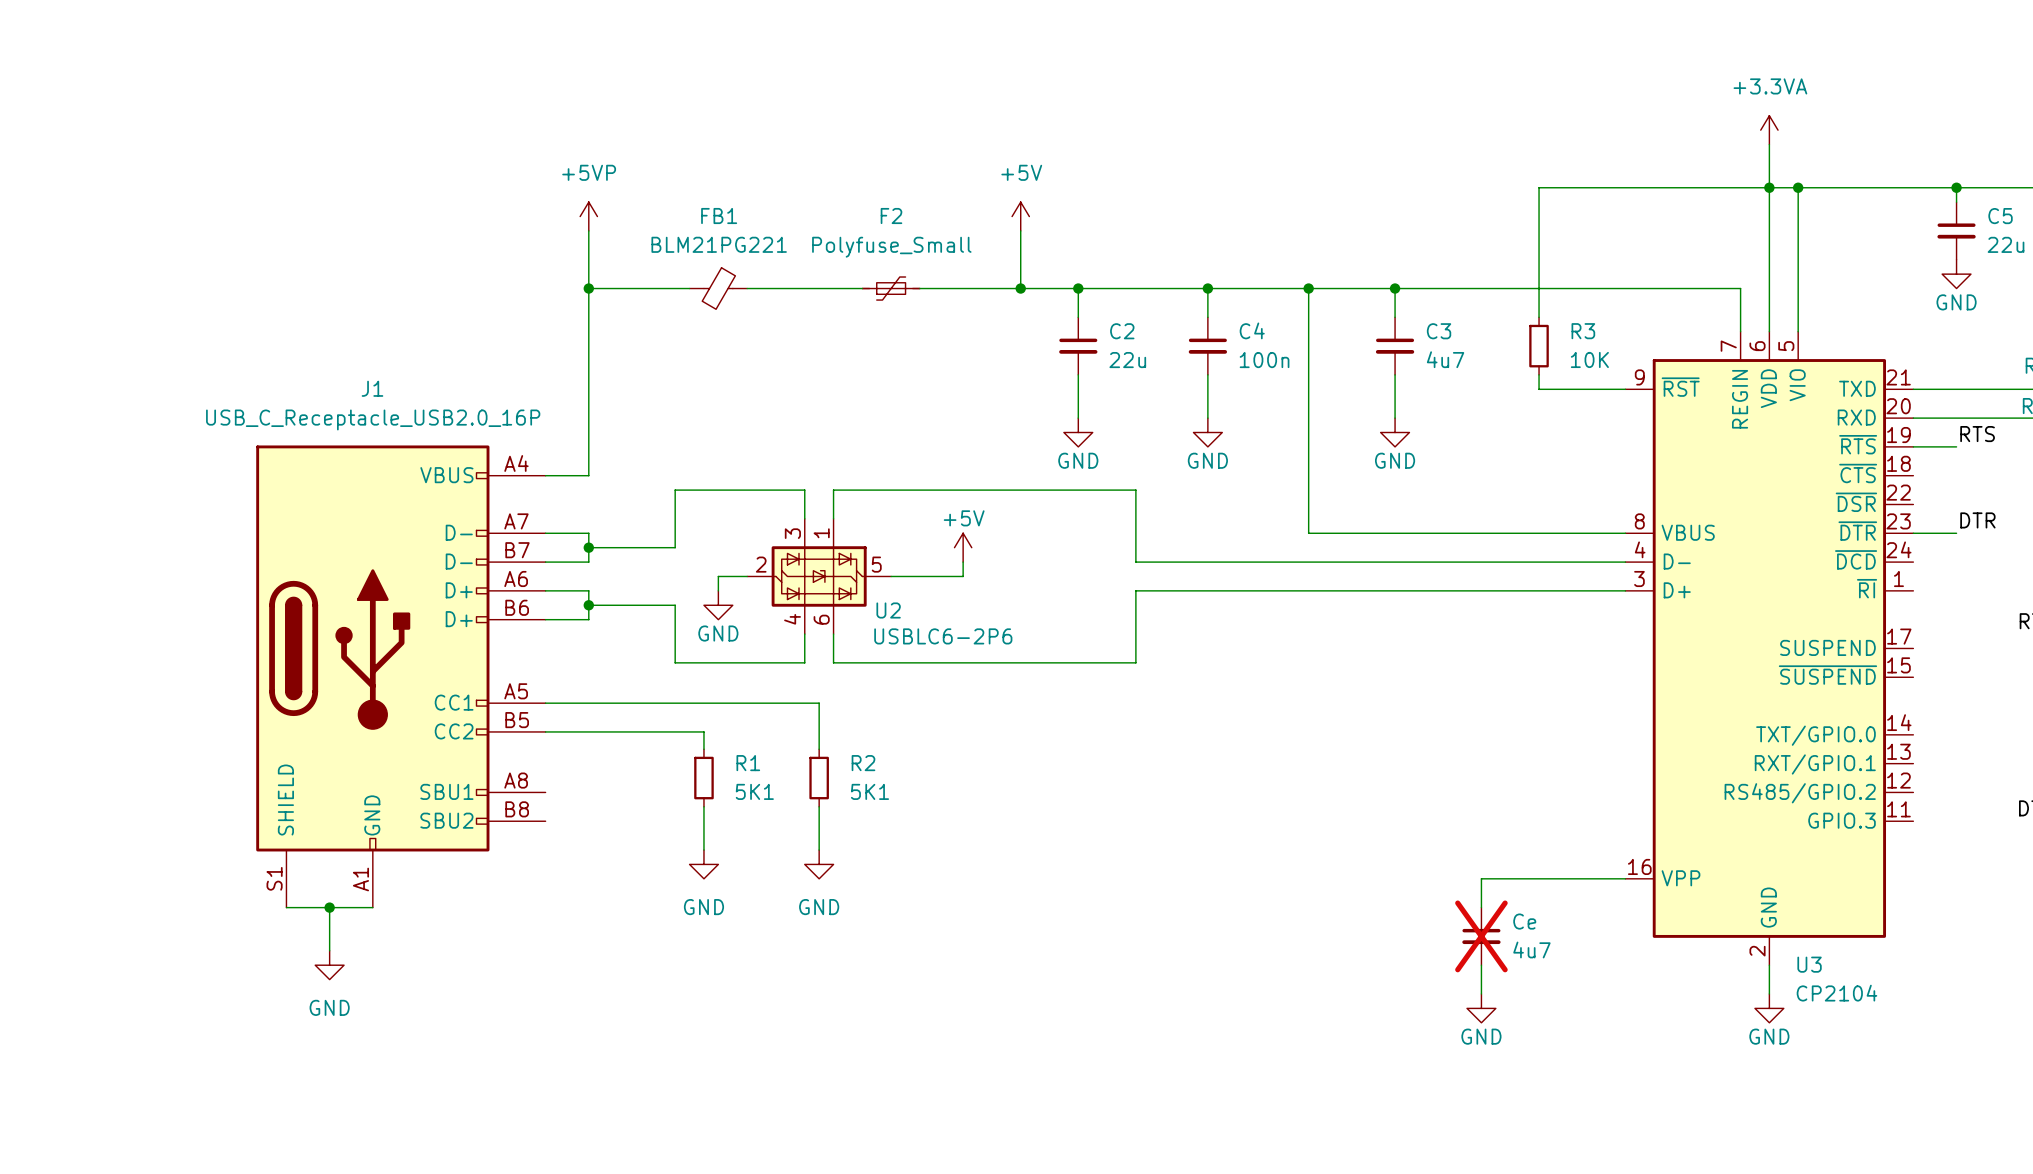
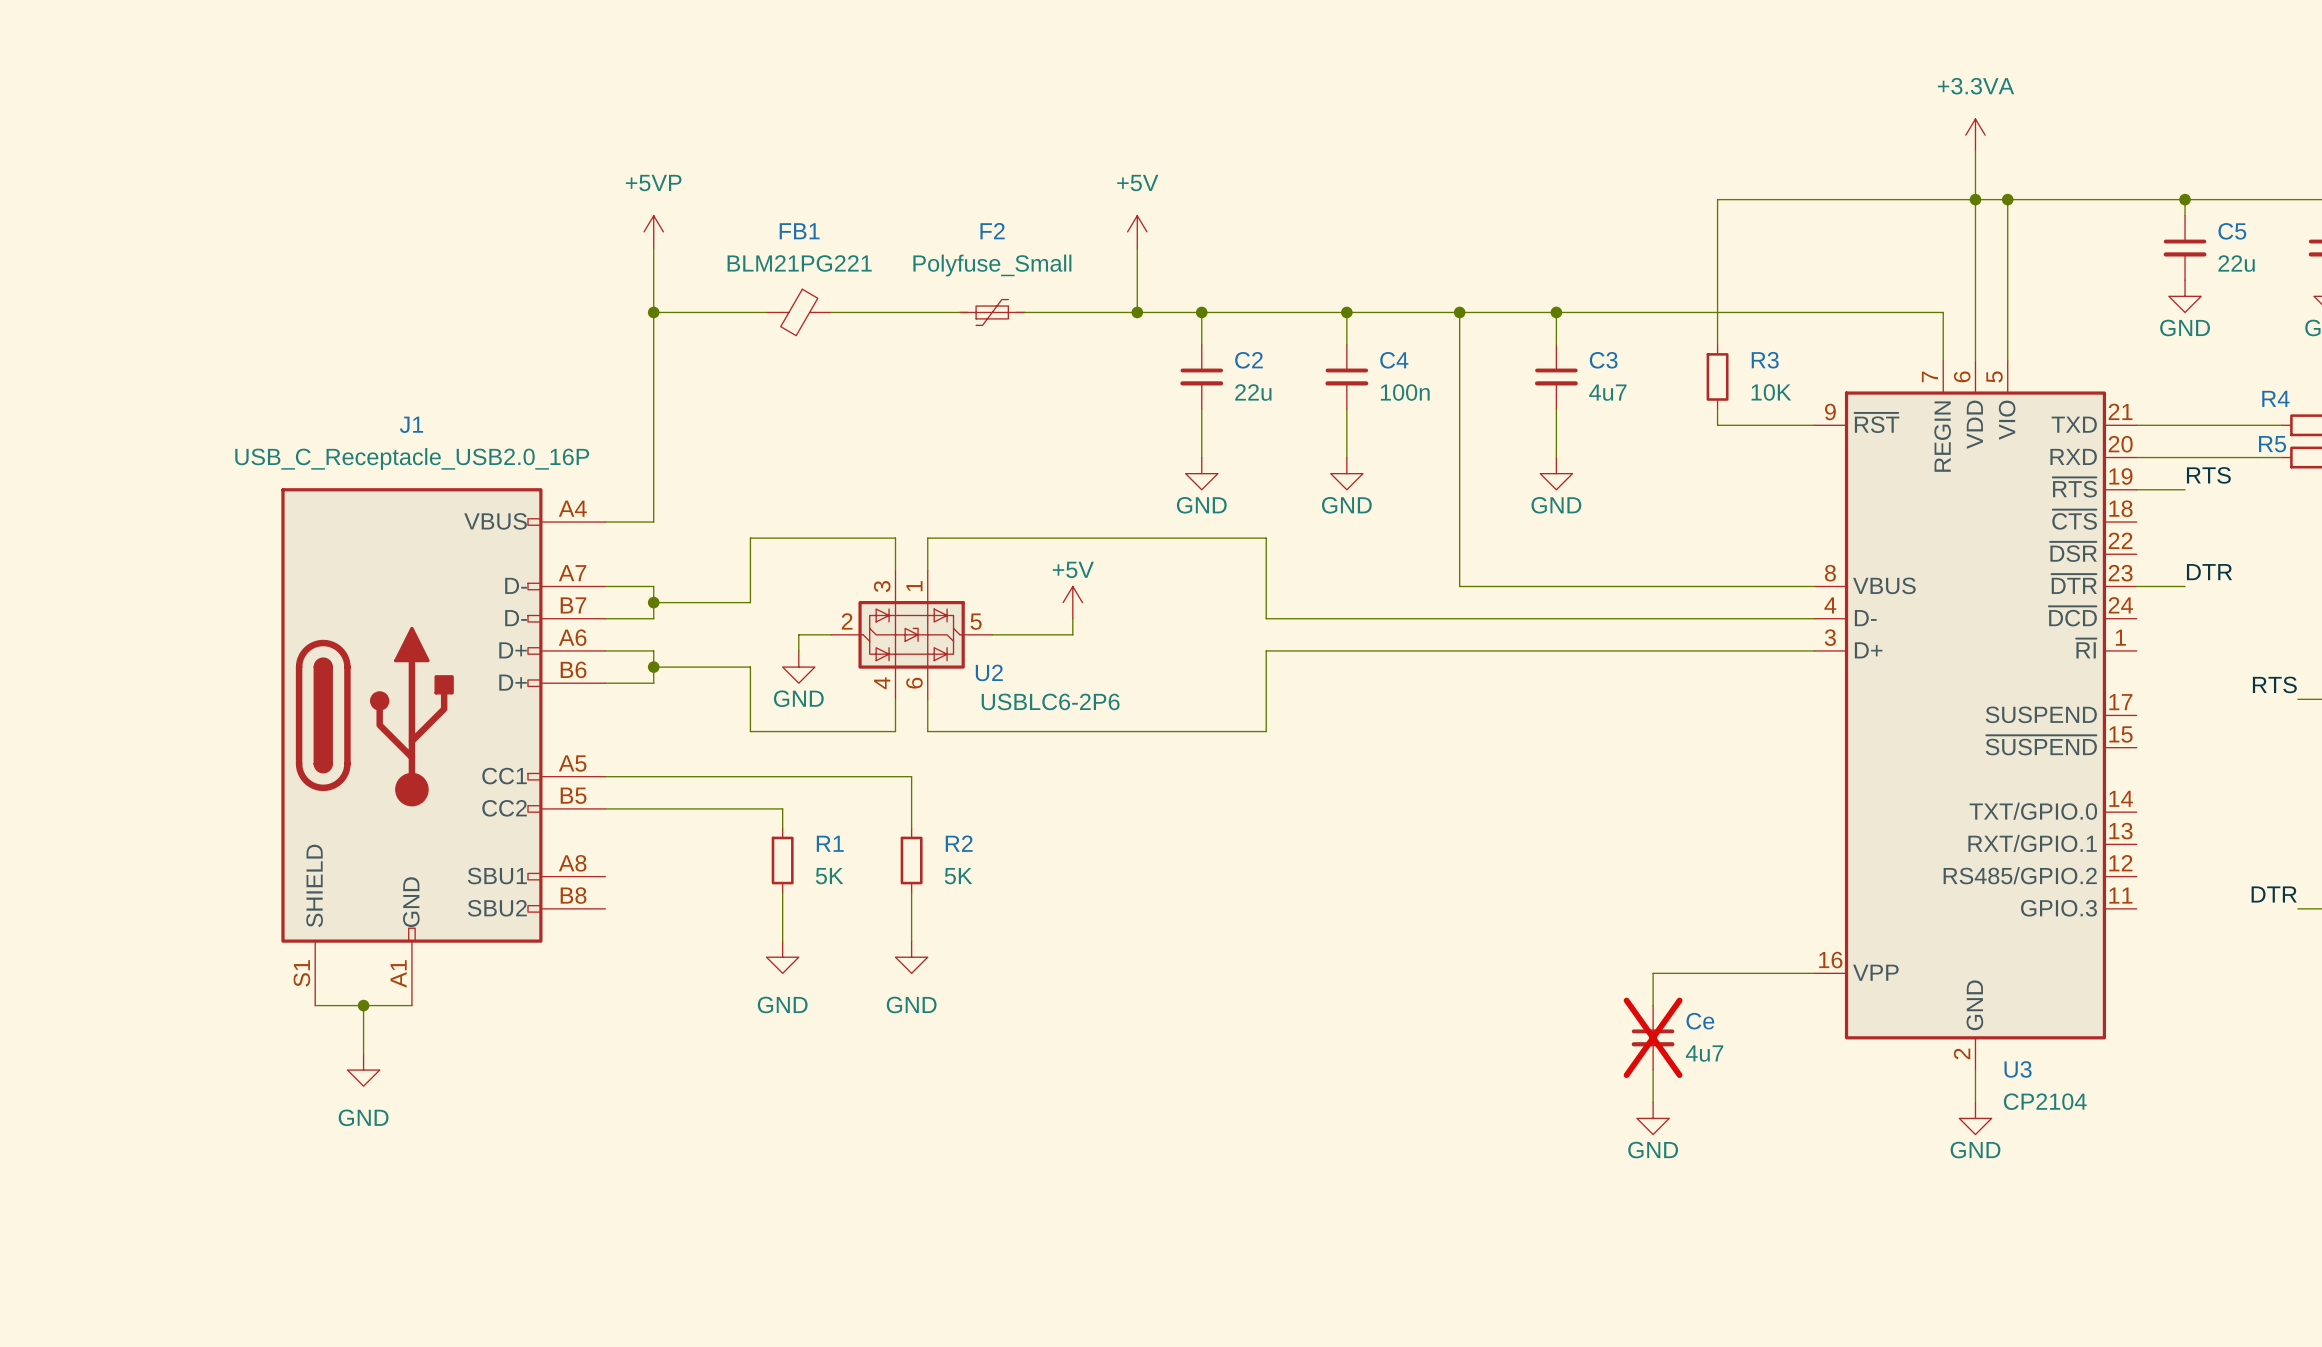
R1 value: 5K1 (754, 791) -> 5K (829, 876)
R2 value: 5K1 (869, 791) -> 5K (958, 876)

